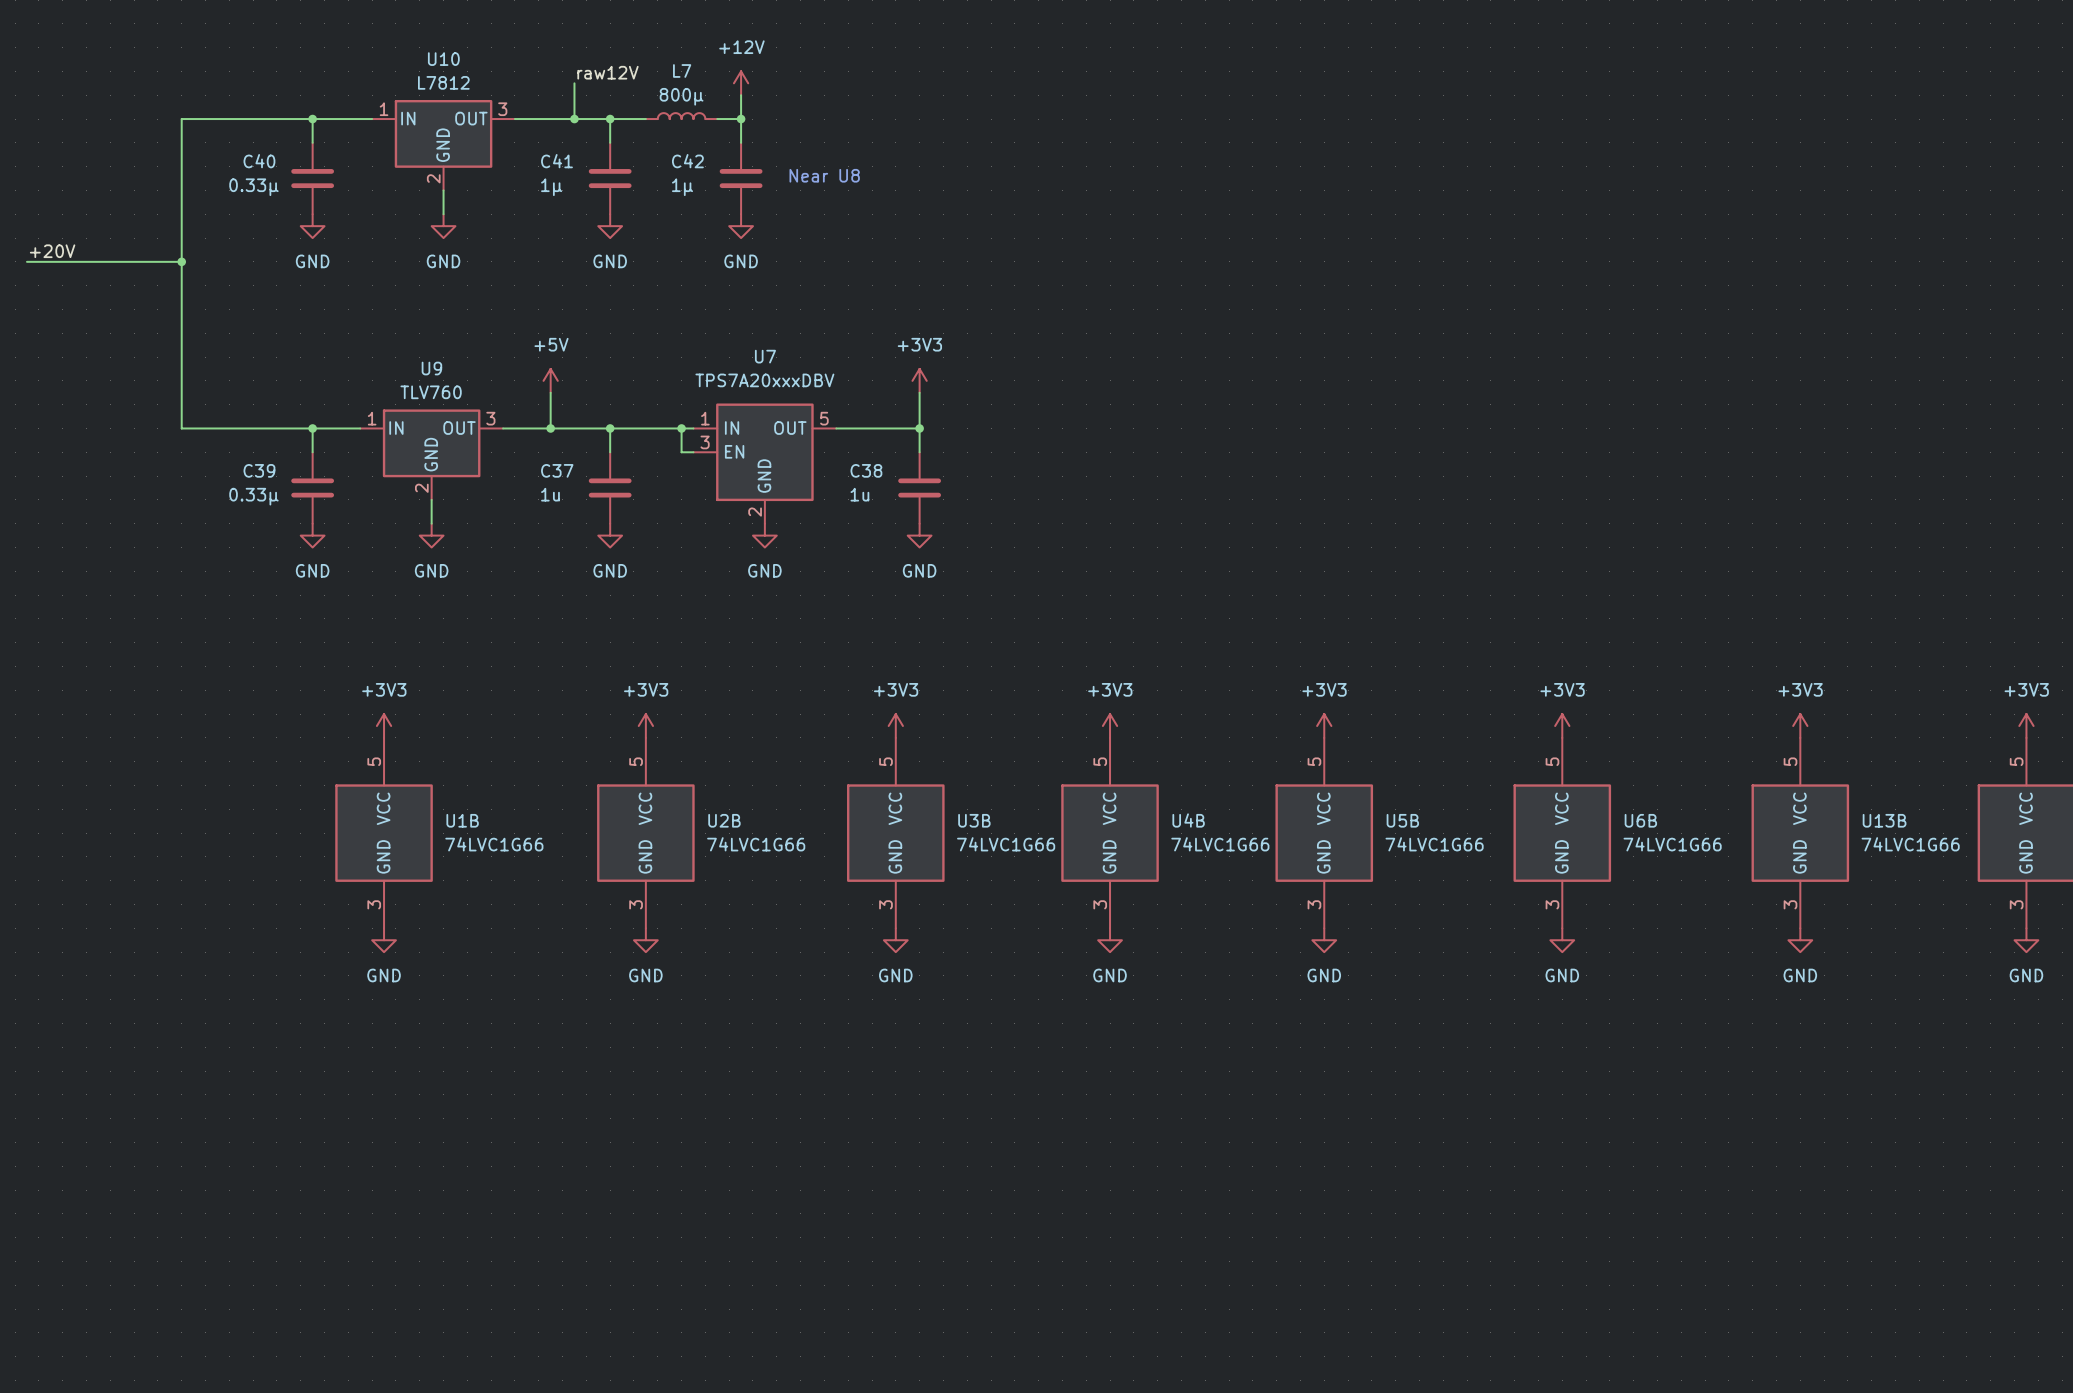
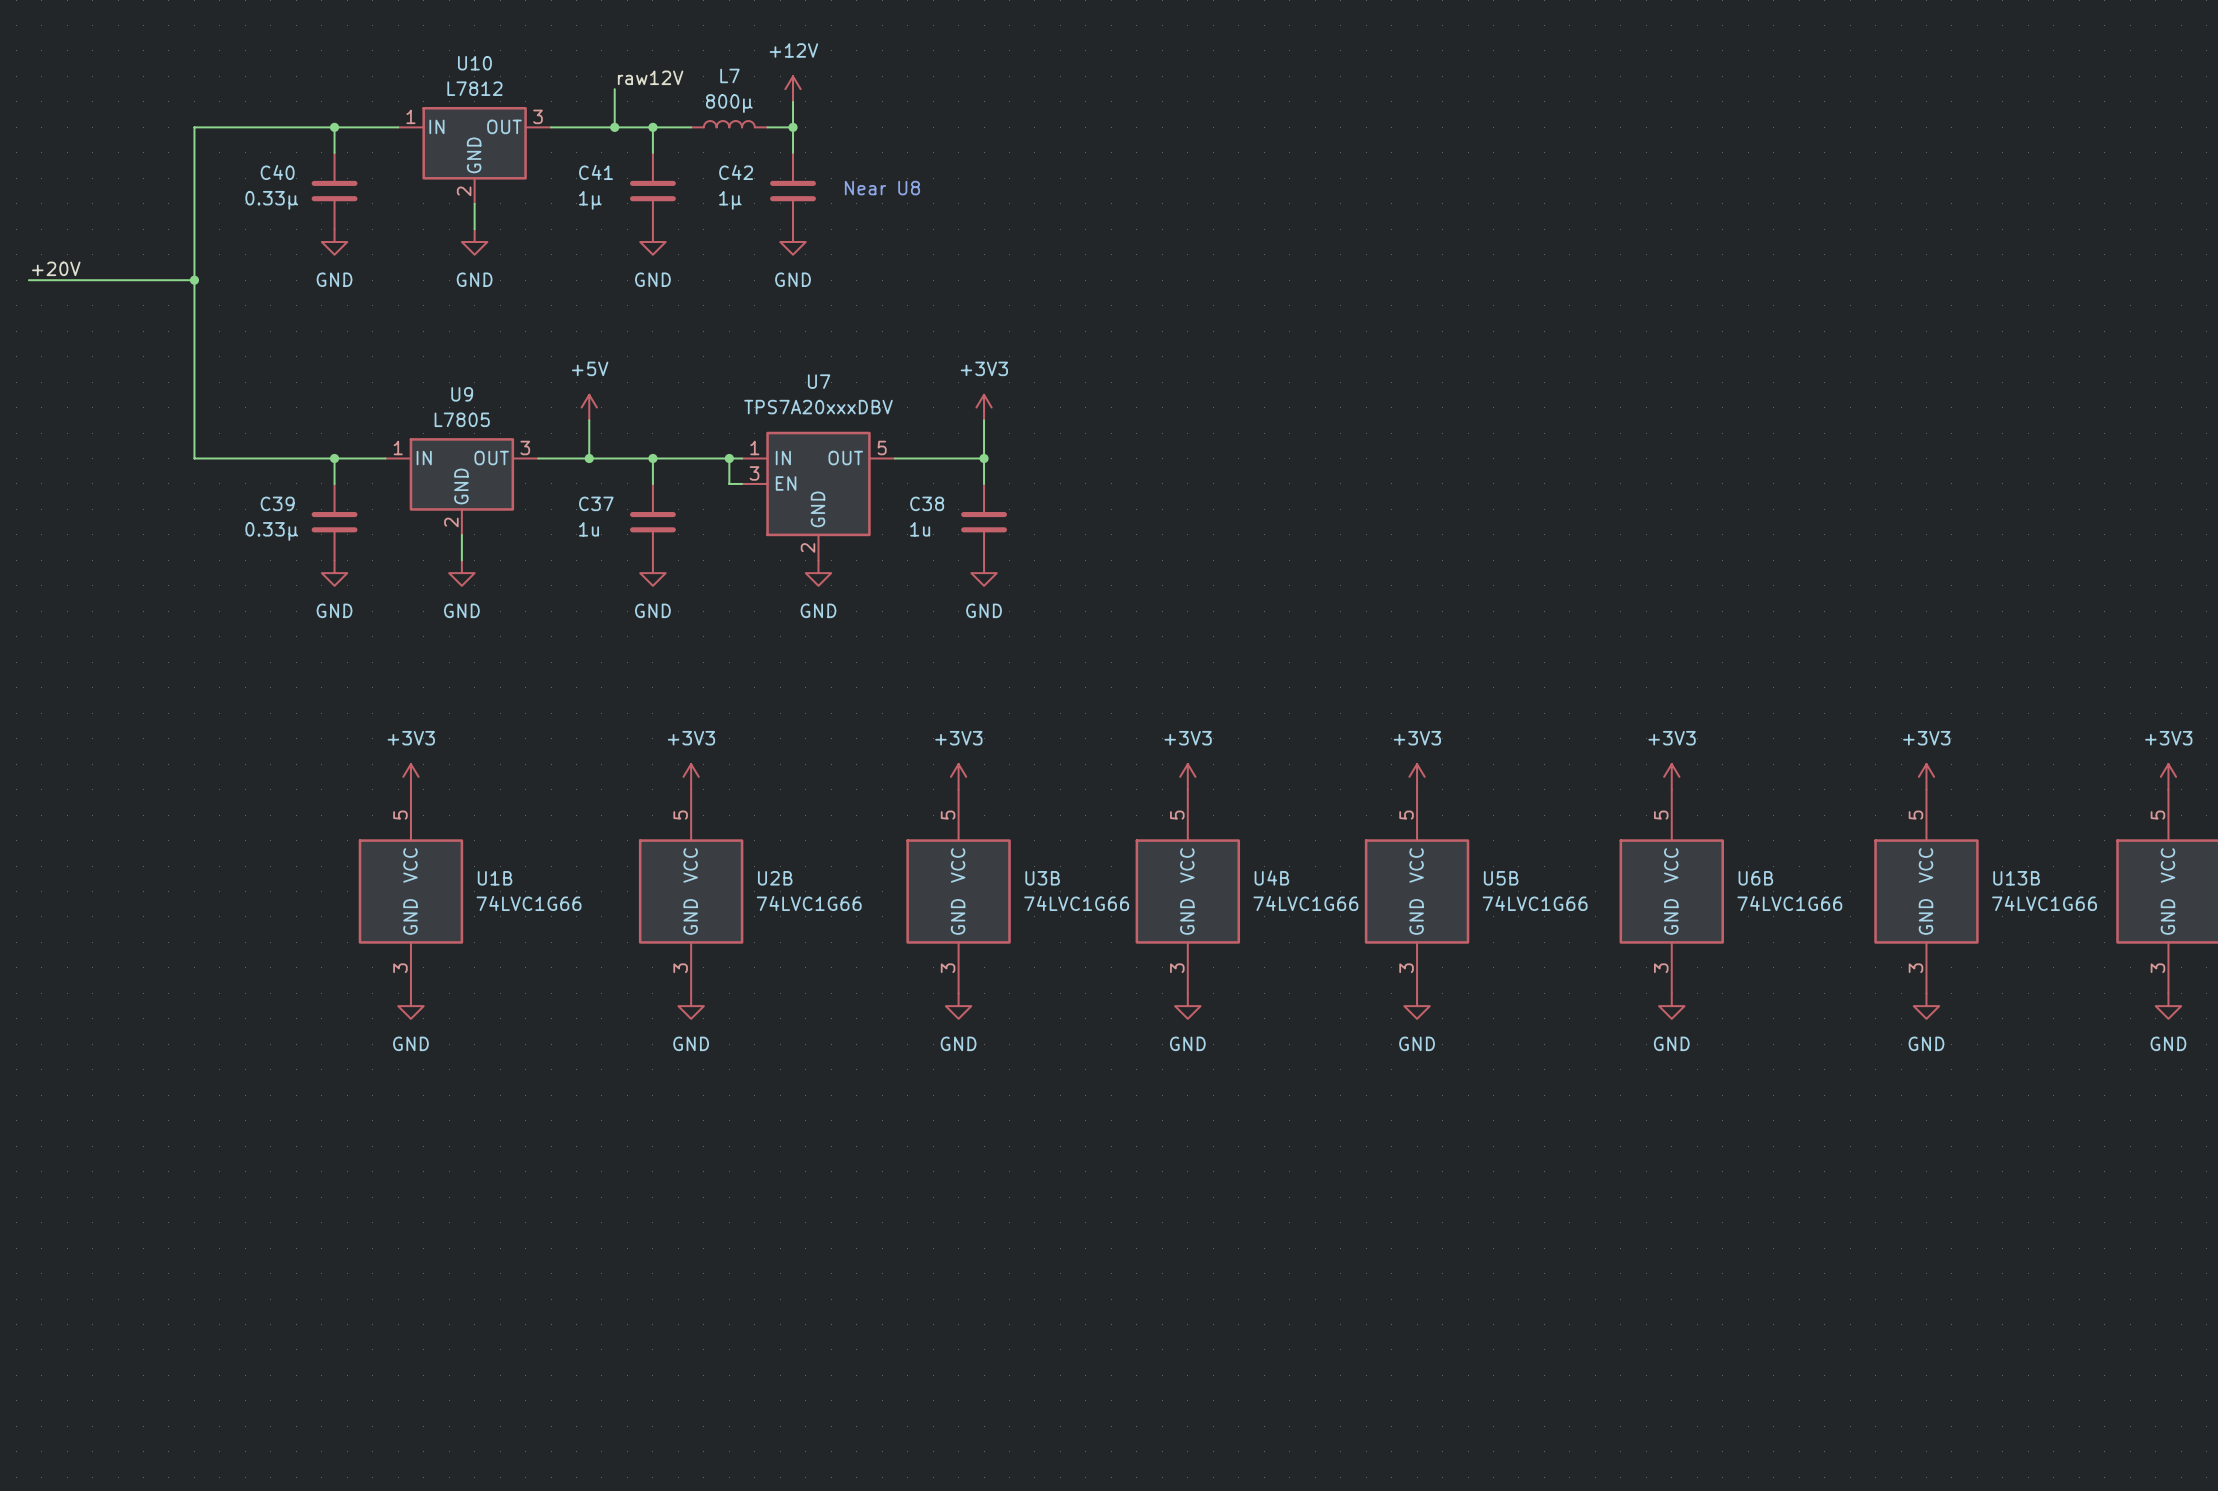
U9 value: TLV760 (431, 392) -> L7805 (462, 419)

